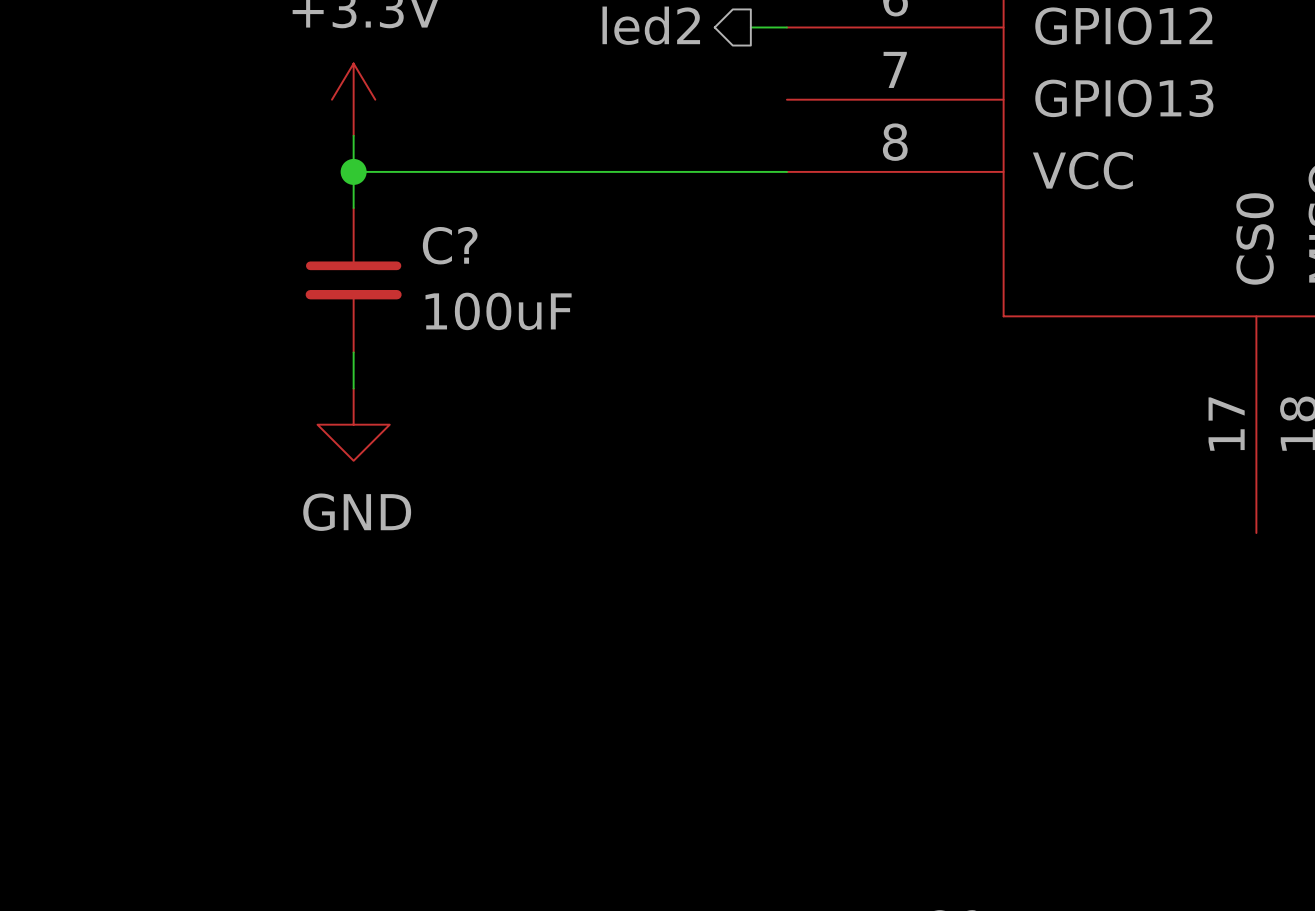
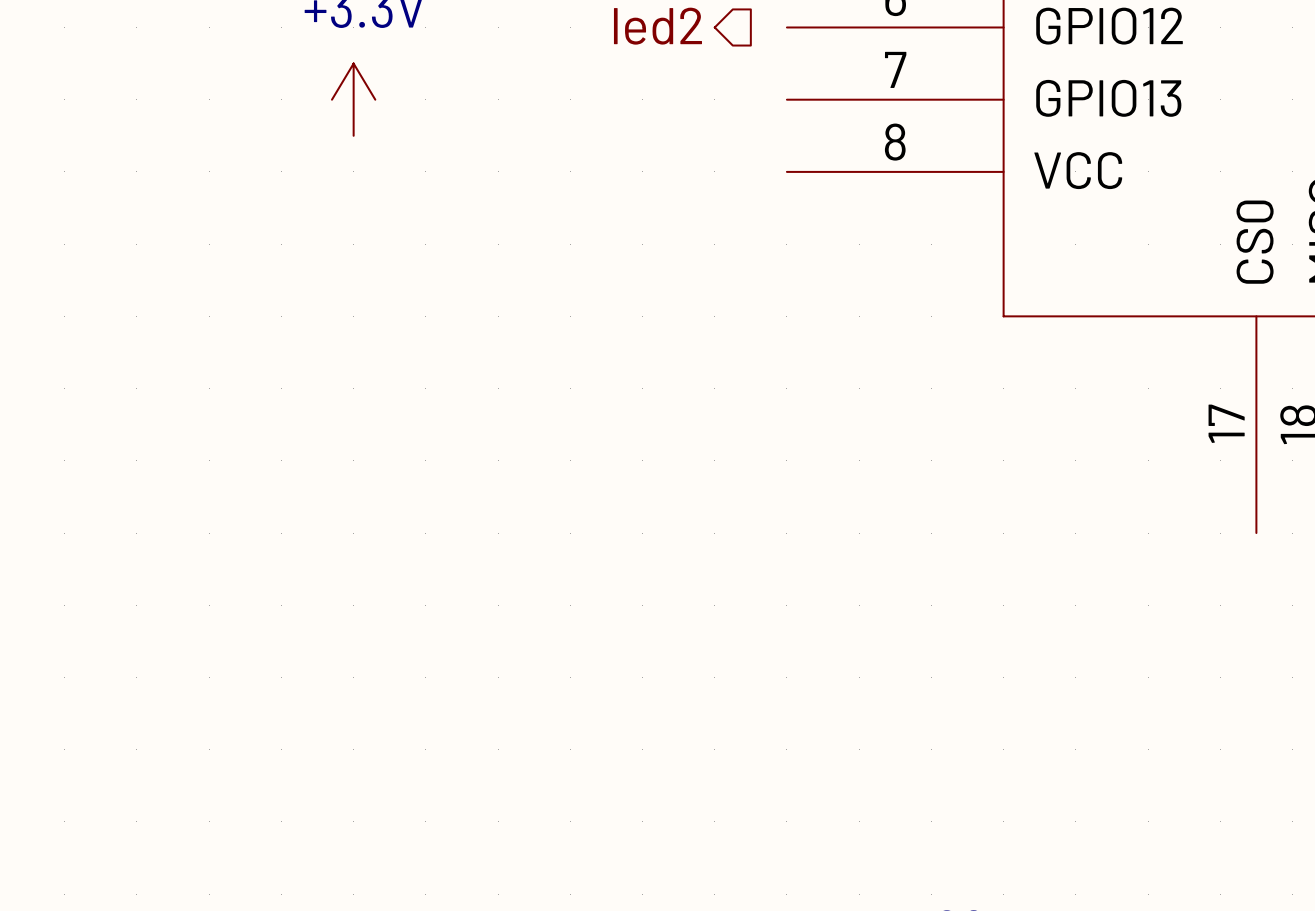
wire: (750, 27) (786, 27) -> none
wire: (353, 135) (353, 208) -> none
wire: (353, 171) (786, 171) -> none
junction: (353, 171) -> none
C?: 100uF (353, 280) -> none
wire: (353, 352) (353, 388) -> none
power symbol: GND (353, 424) -> none

